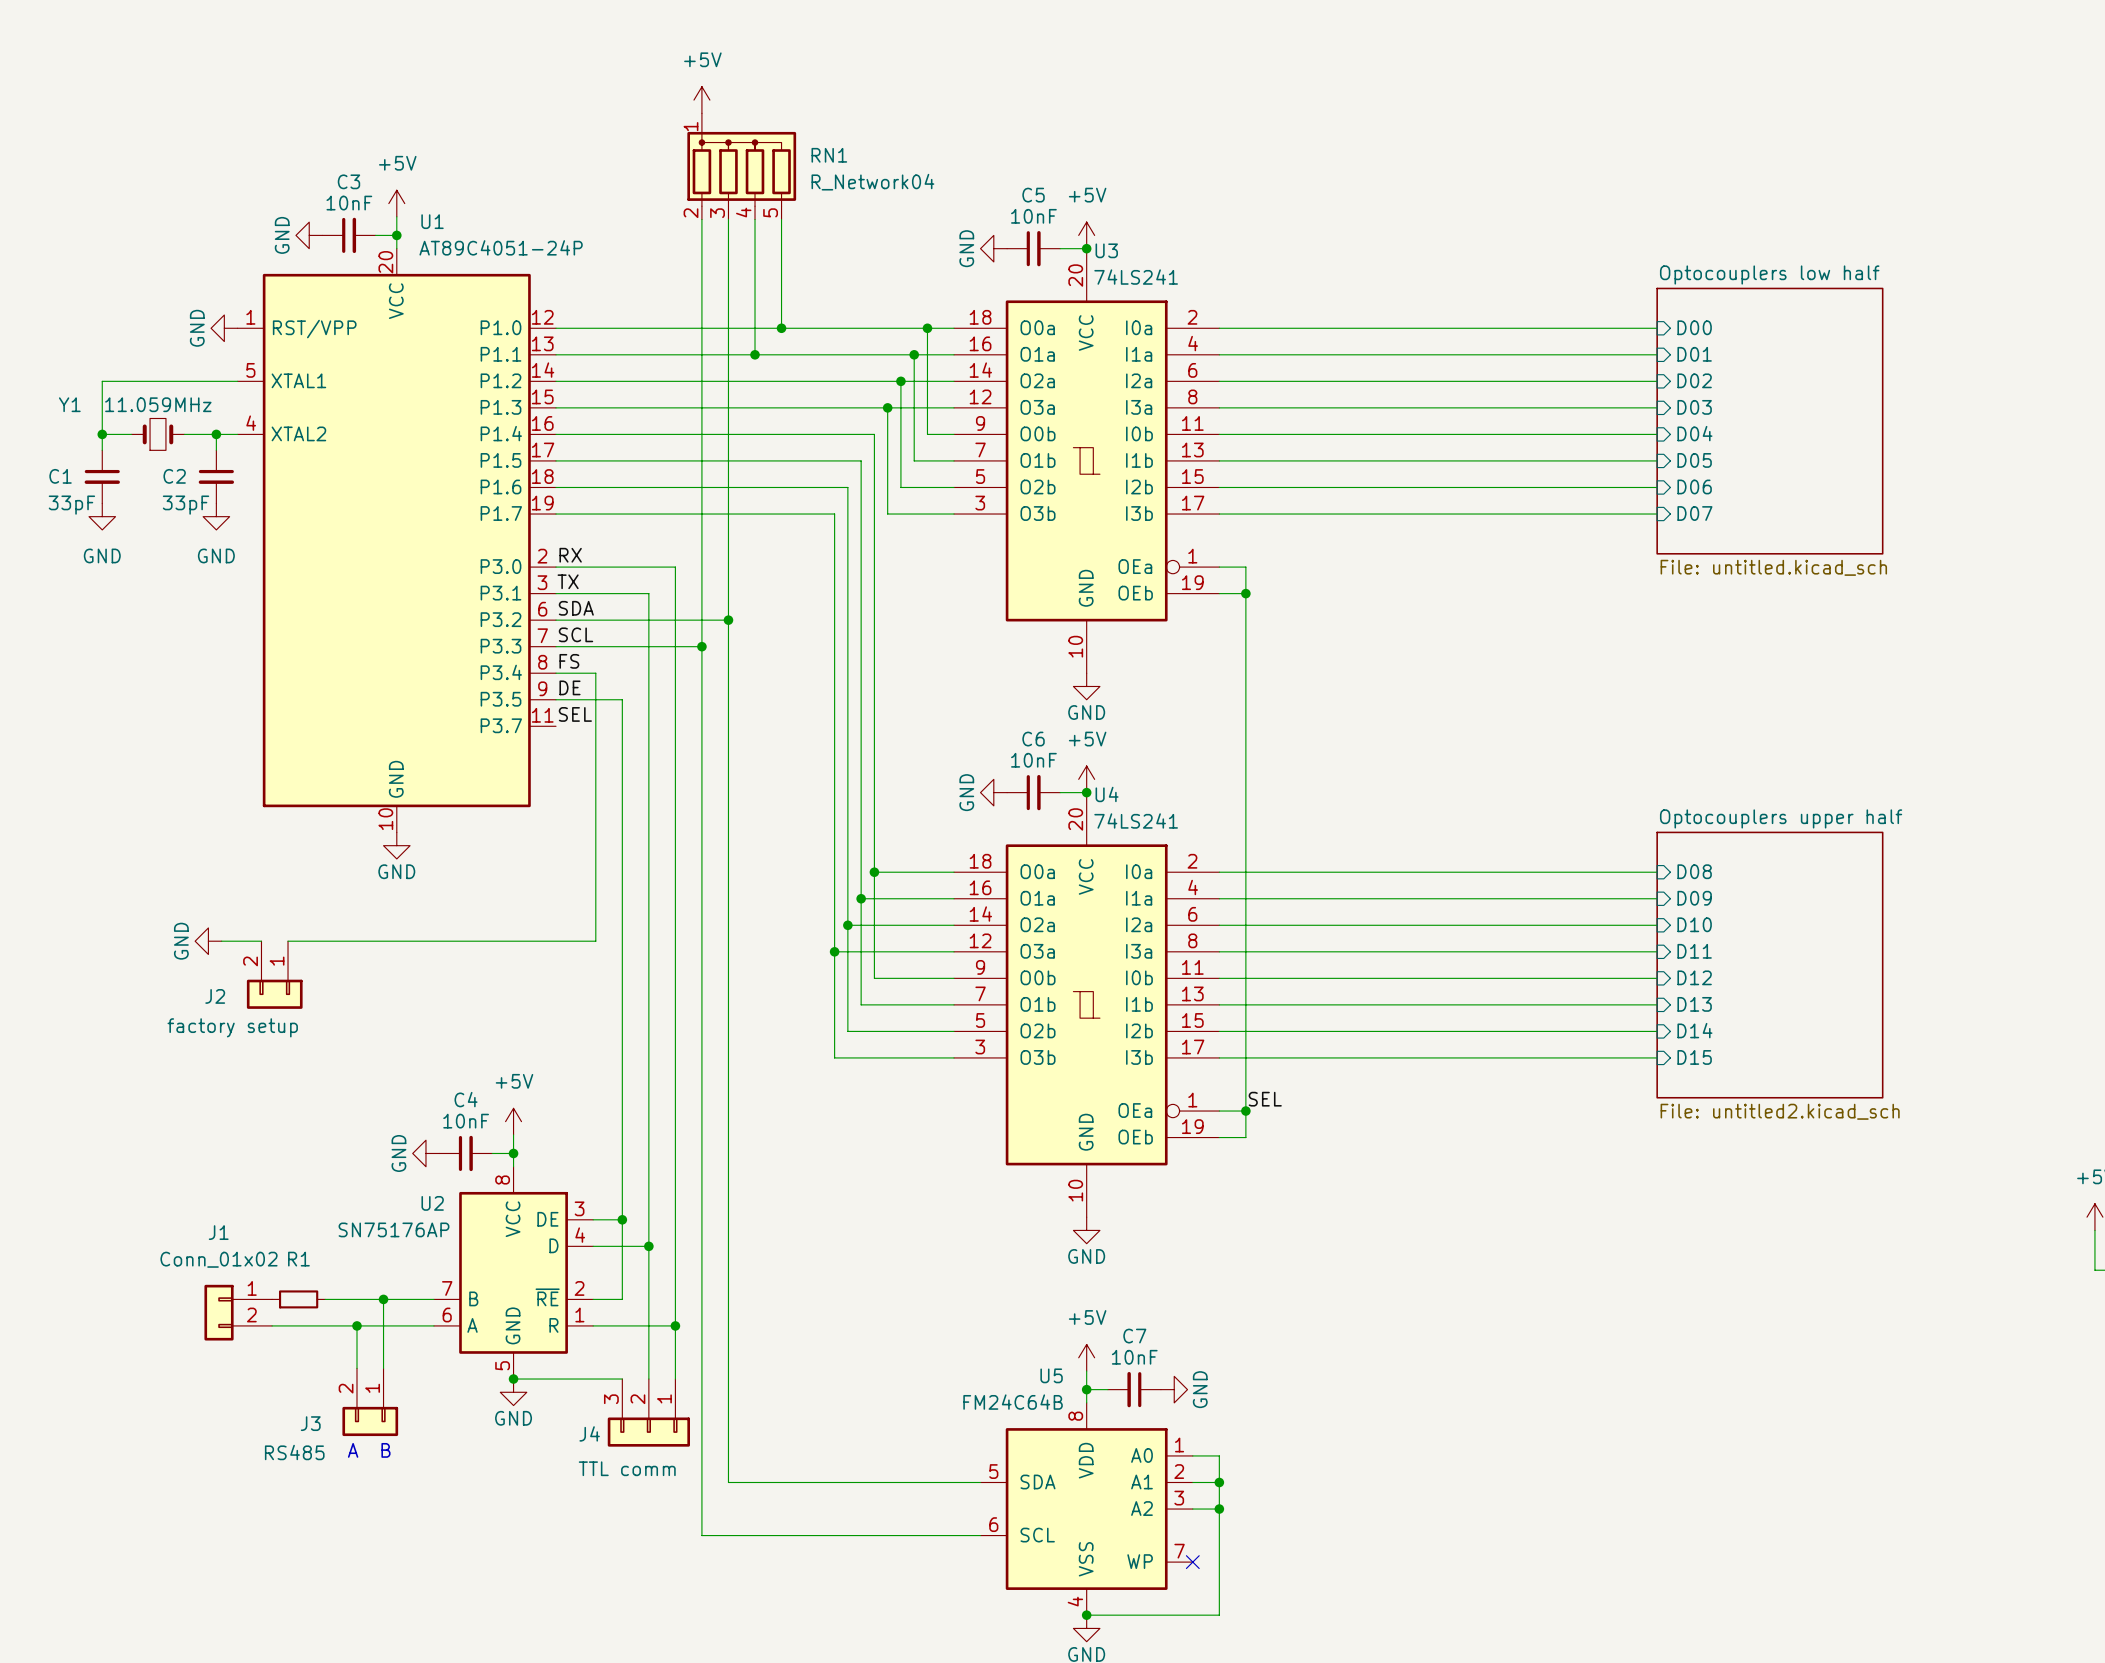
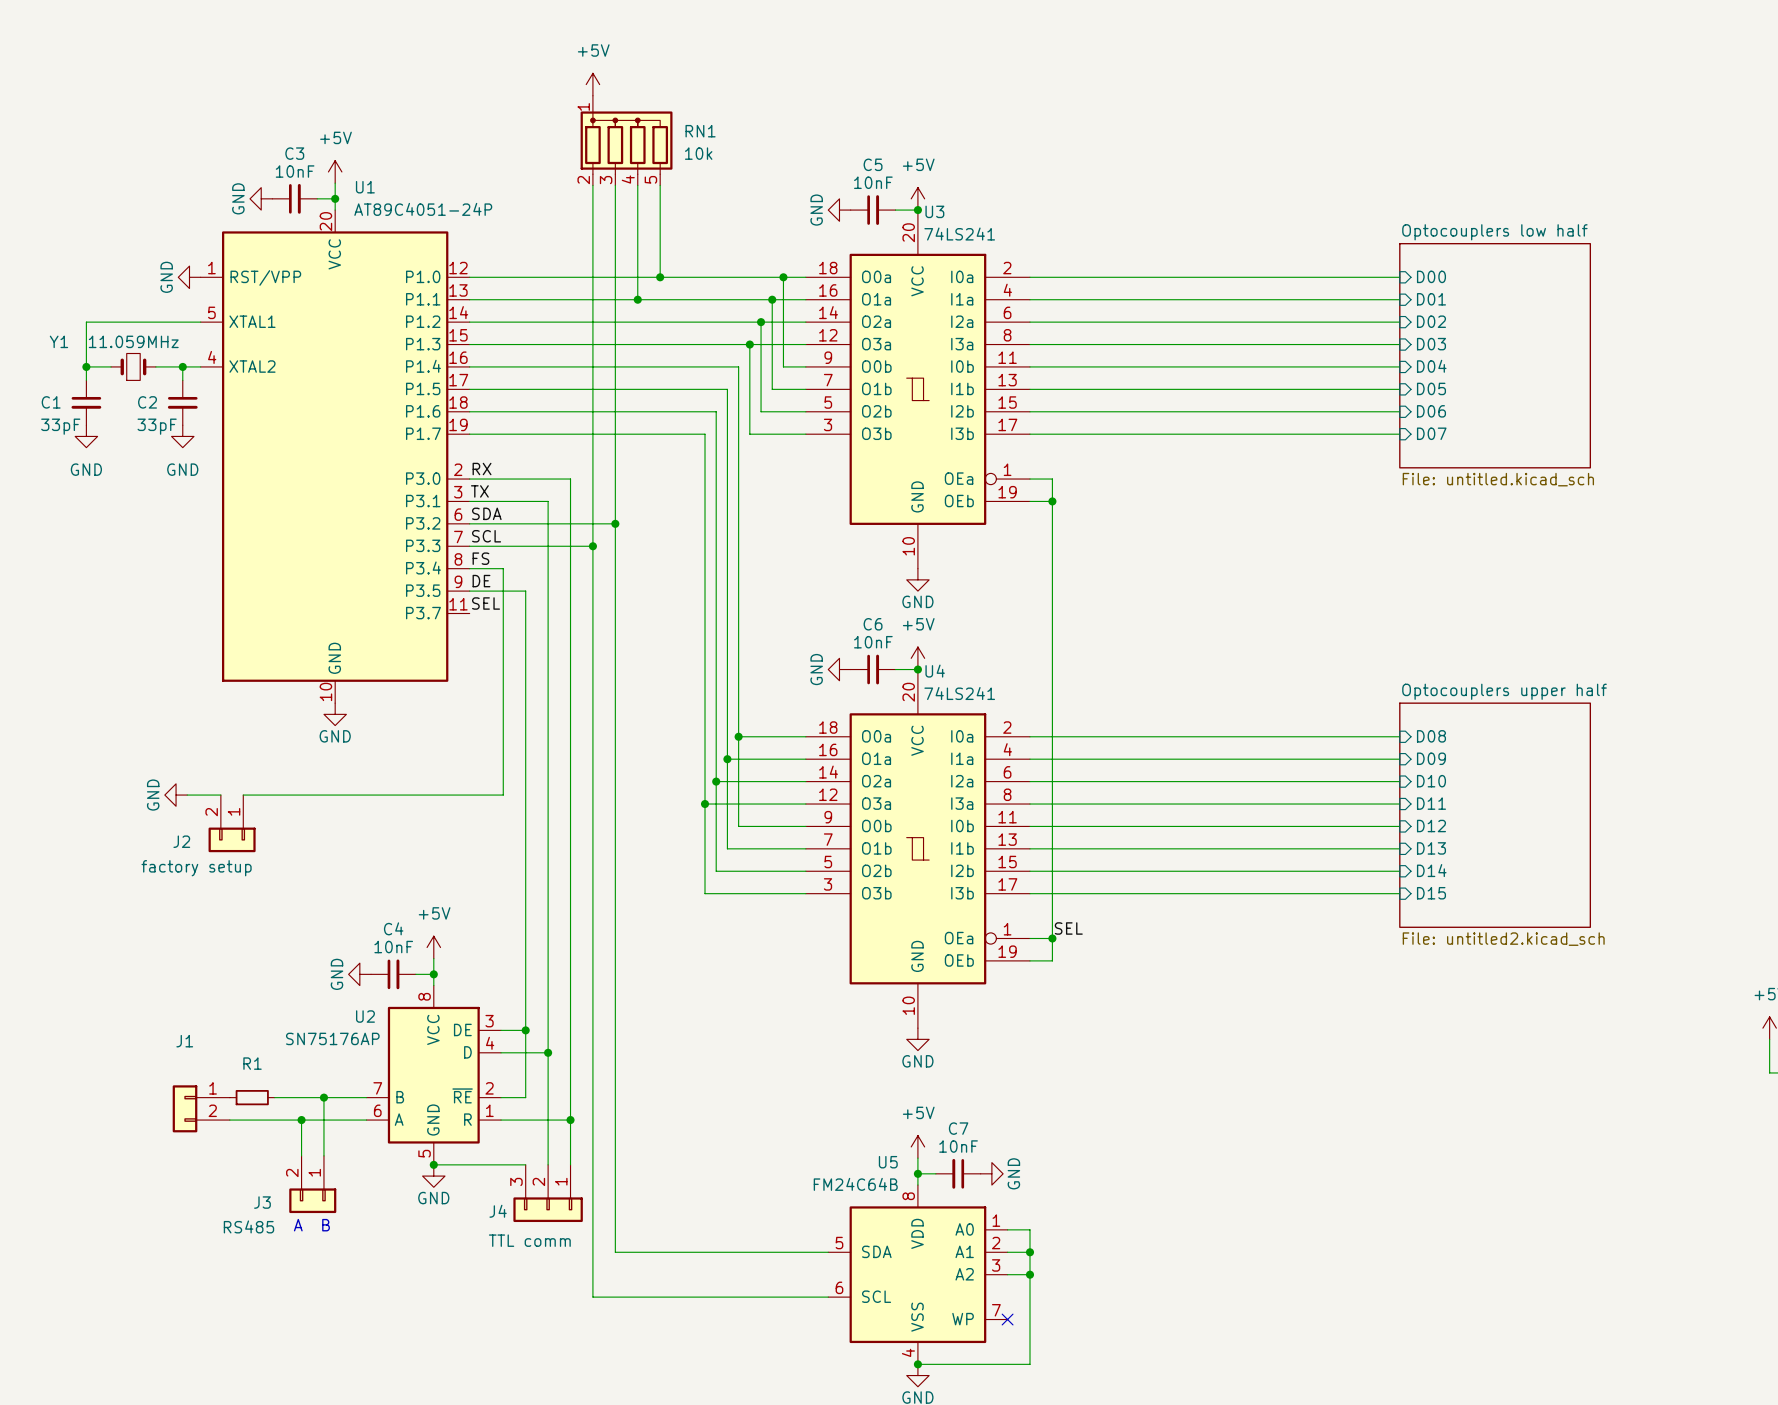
RN1 value: R_Network04 (872, 182) -> 10k (698, 153)
J1 value: Conn_01x02 (219, 1259) -> none

